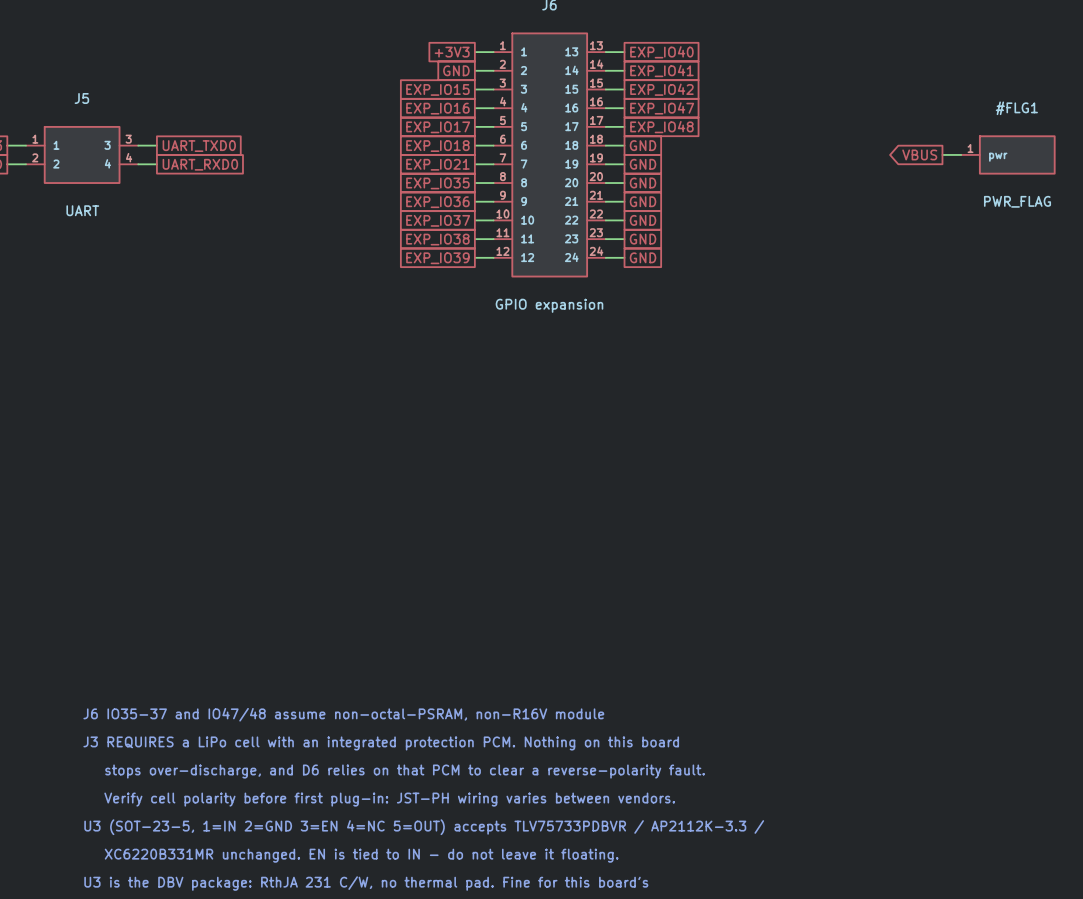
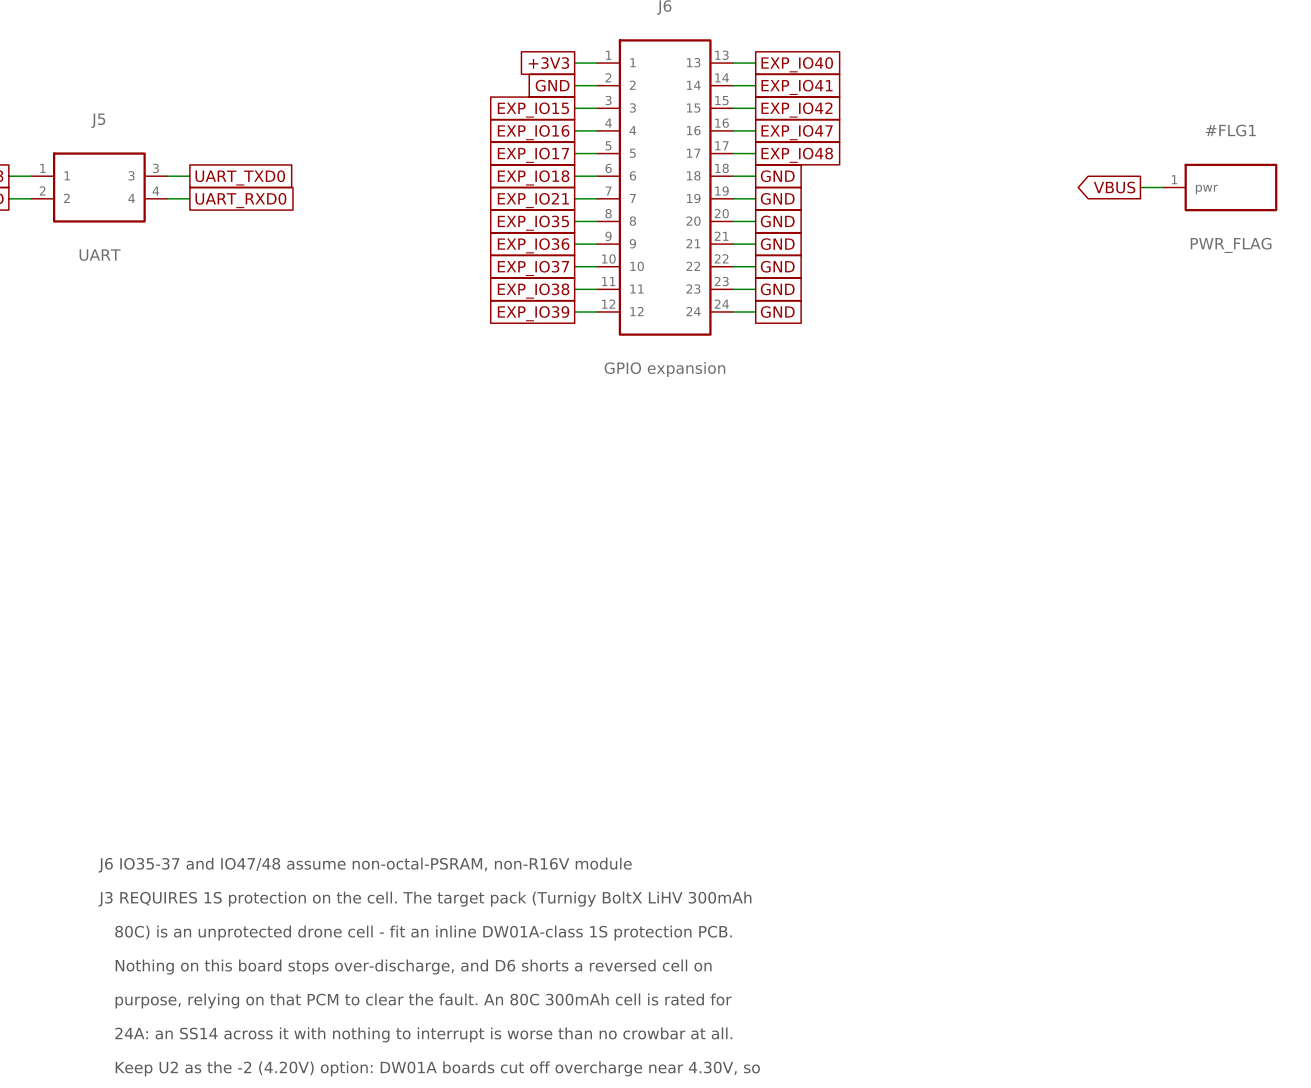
text: J3 REQUIRES a LiPo cell with an integrated protection PCM. Nothing on this board (381, 743) -> J3 REQUIRES 1S protection on the cell. The target pack (Turnigy BoltX LiHV 300mAh (425, 899)
text: stops over-discharge, and D6 relies on that PCM to clear a reverse-polarity fault. (405, 771) -> 80C) is an unprotected drone cell - fit an inline DW01A-class 1S protection PCB. (423, 933)
text: Verify cell polarity before first plug-in: JST-PH wiring varies between vendors. (389, 799) -> Nothing on this board stops over-discharge, and D6 shorts a reversed cell on (413, 967)
text: U3 (SOT-23-5, 1=IN 2=GND 3=EN 4=NC 5=OUT) accepts TLV75733PDBVR / AP2112K-3.3 / (424, 827) -> purpose, relying on that PCM to clear the fault. An 80C 300mAh cell is rated for (423, 1000)
text: XC6220B331MR unchanged. EN is tied to IN - do not leave it floating. (361, 855) -> 24A: an SS14 across it with nothing to interrupt is worse than no crowbar at all. (423, 1034)
text: U3 is the DBV package: RthJA 231 C/W, no thermal pad. Fine for this board's (366, 883) -> Keep U2 as the -2 (4.20V) option: DW01A boards cut off overcharge near 4.30V, so (437, 1068)

